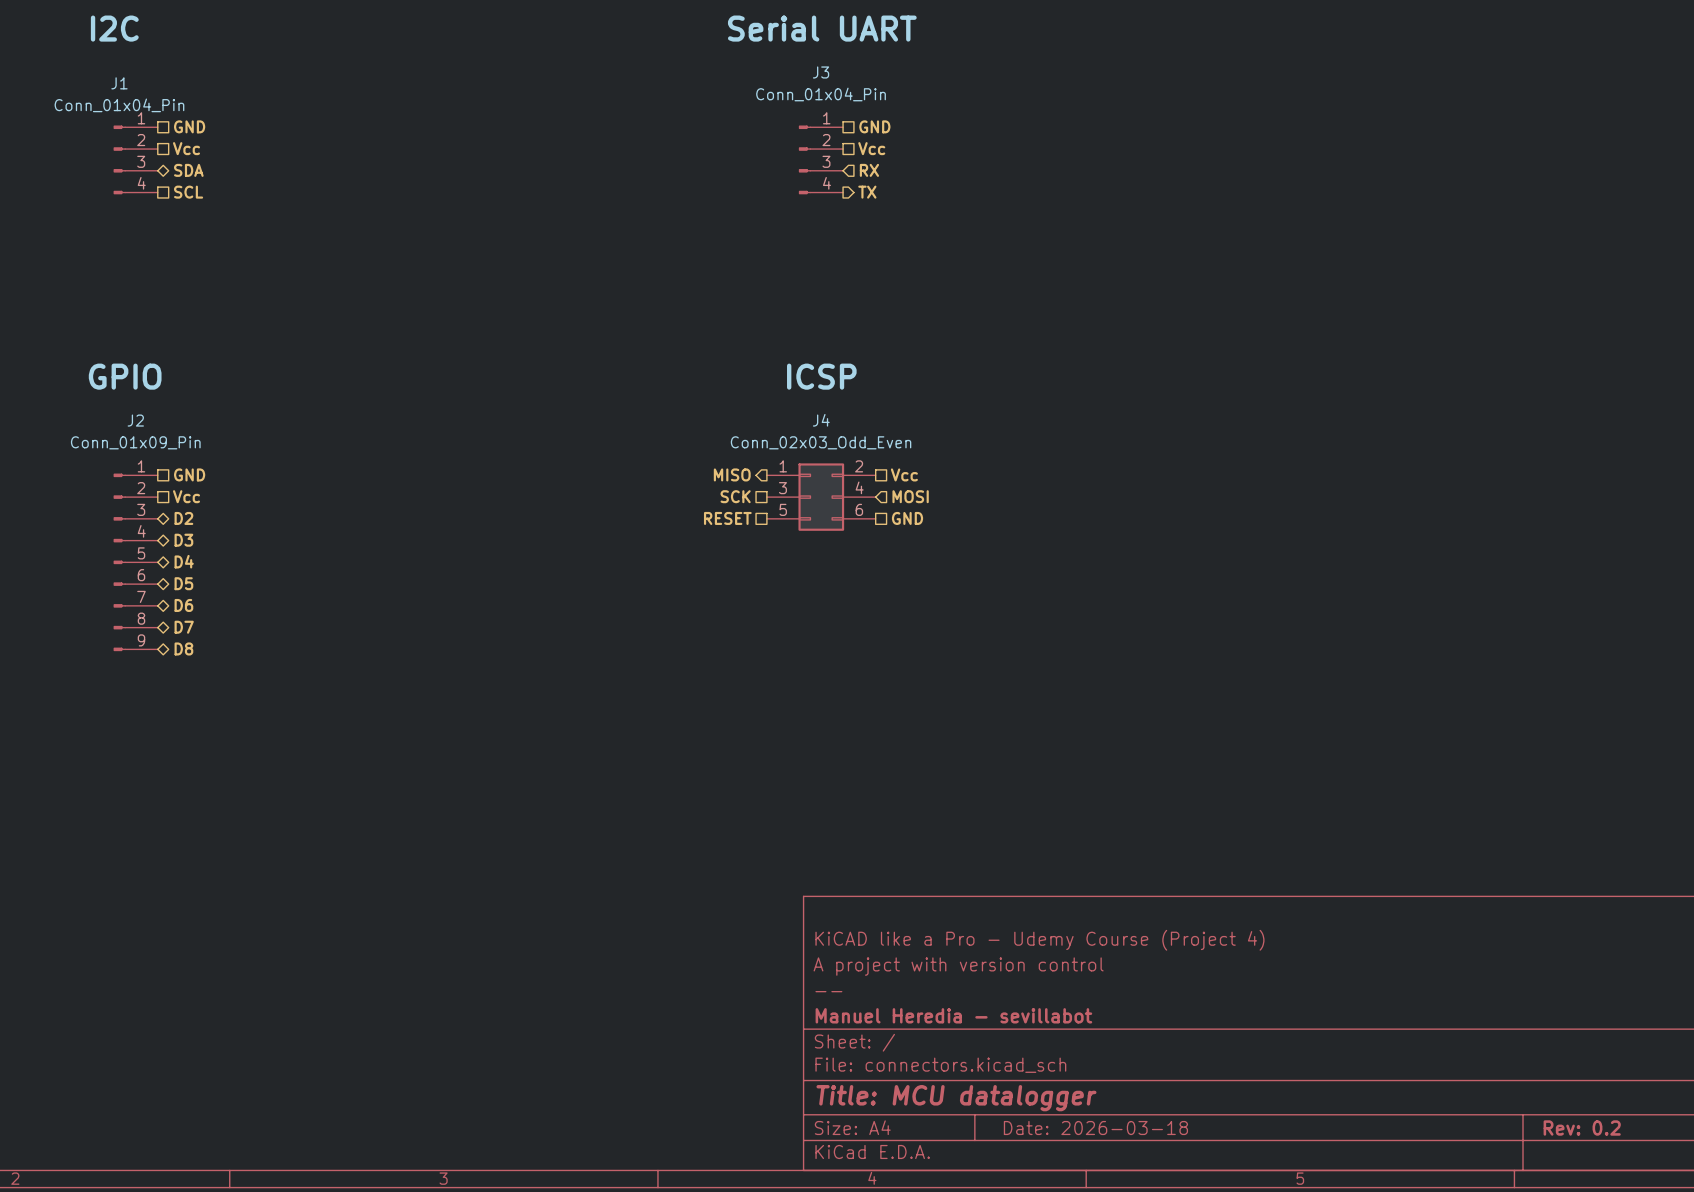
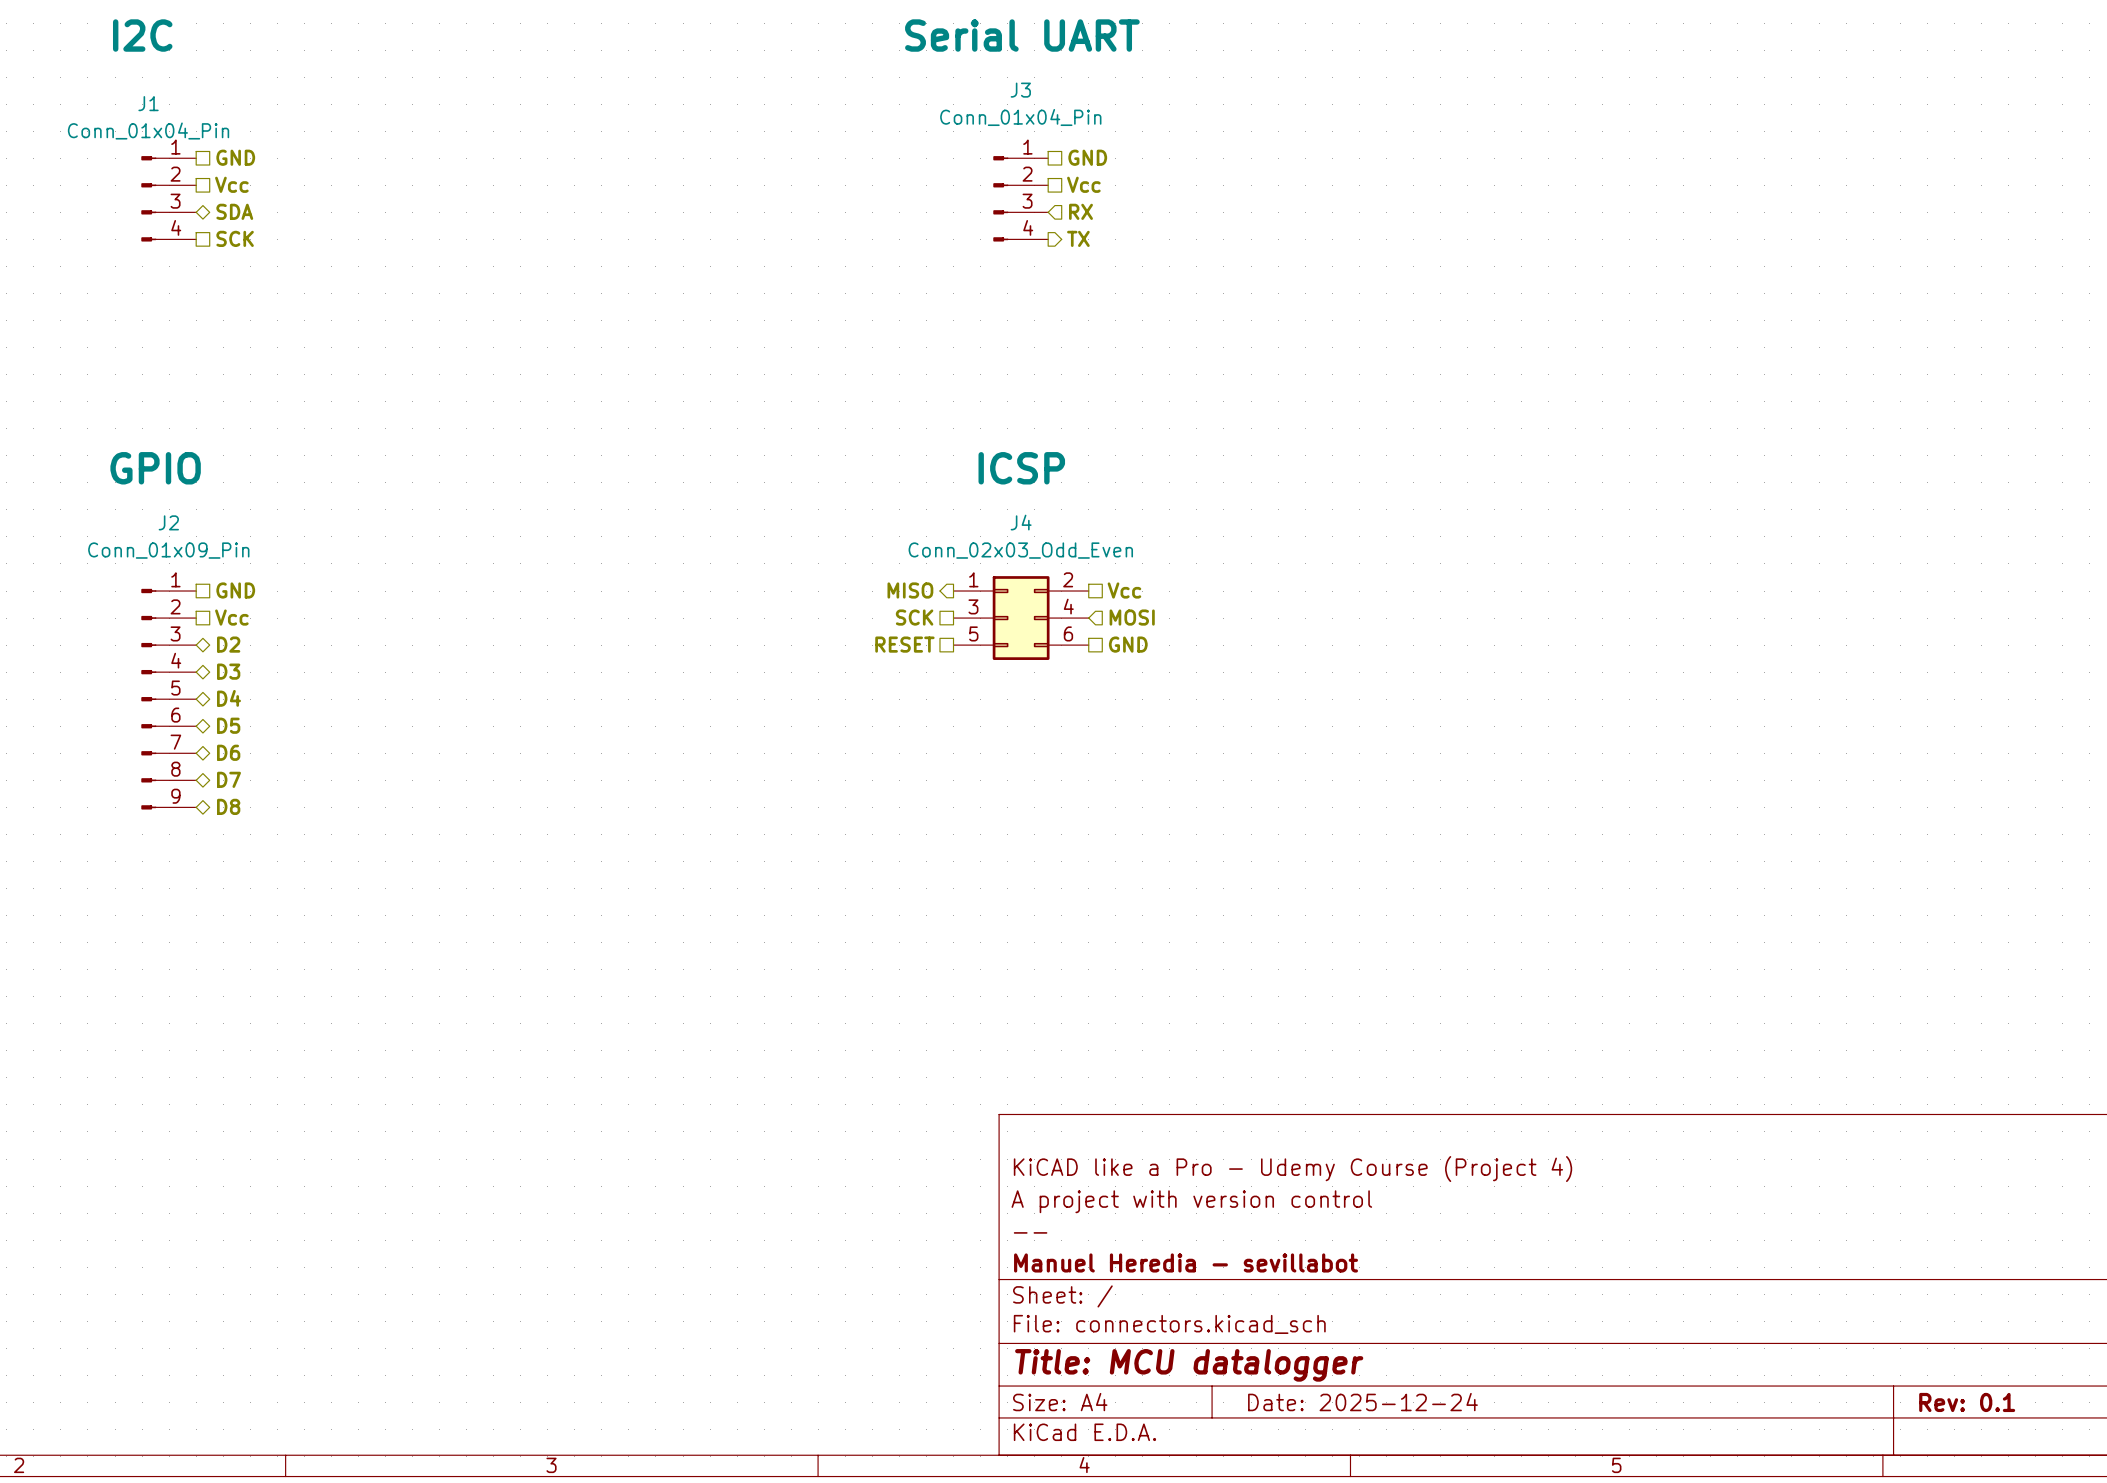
hierarchical label: SCL (188, 192) -> SCK (235, 238)
title block: Date: 2026-03-18 (1095, 1128) -> Date: 2025-12-24 (1362, 1402)
title block: Rev: 0.2 (1582, 1128) -> Rev: 0.1 (1967, 1402)

